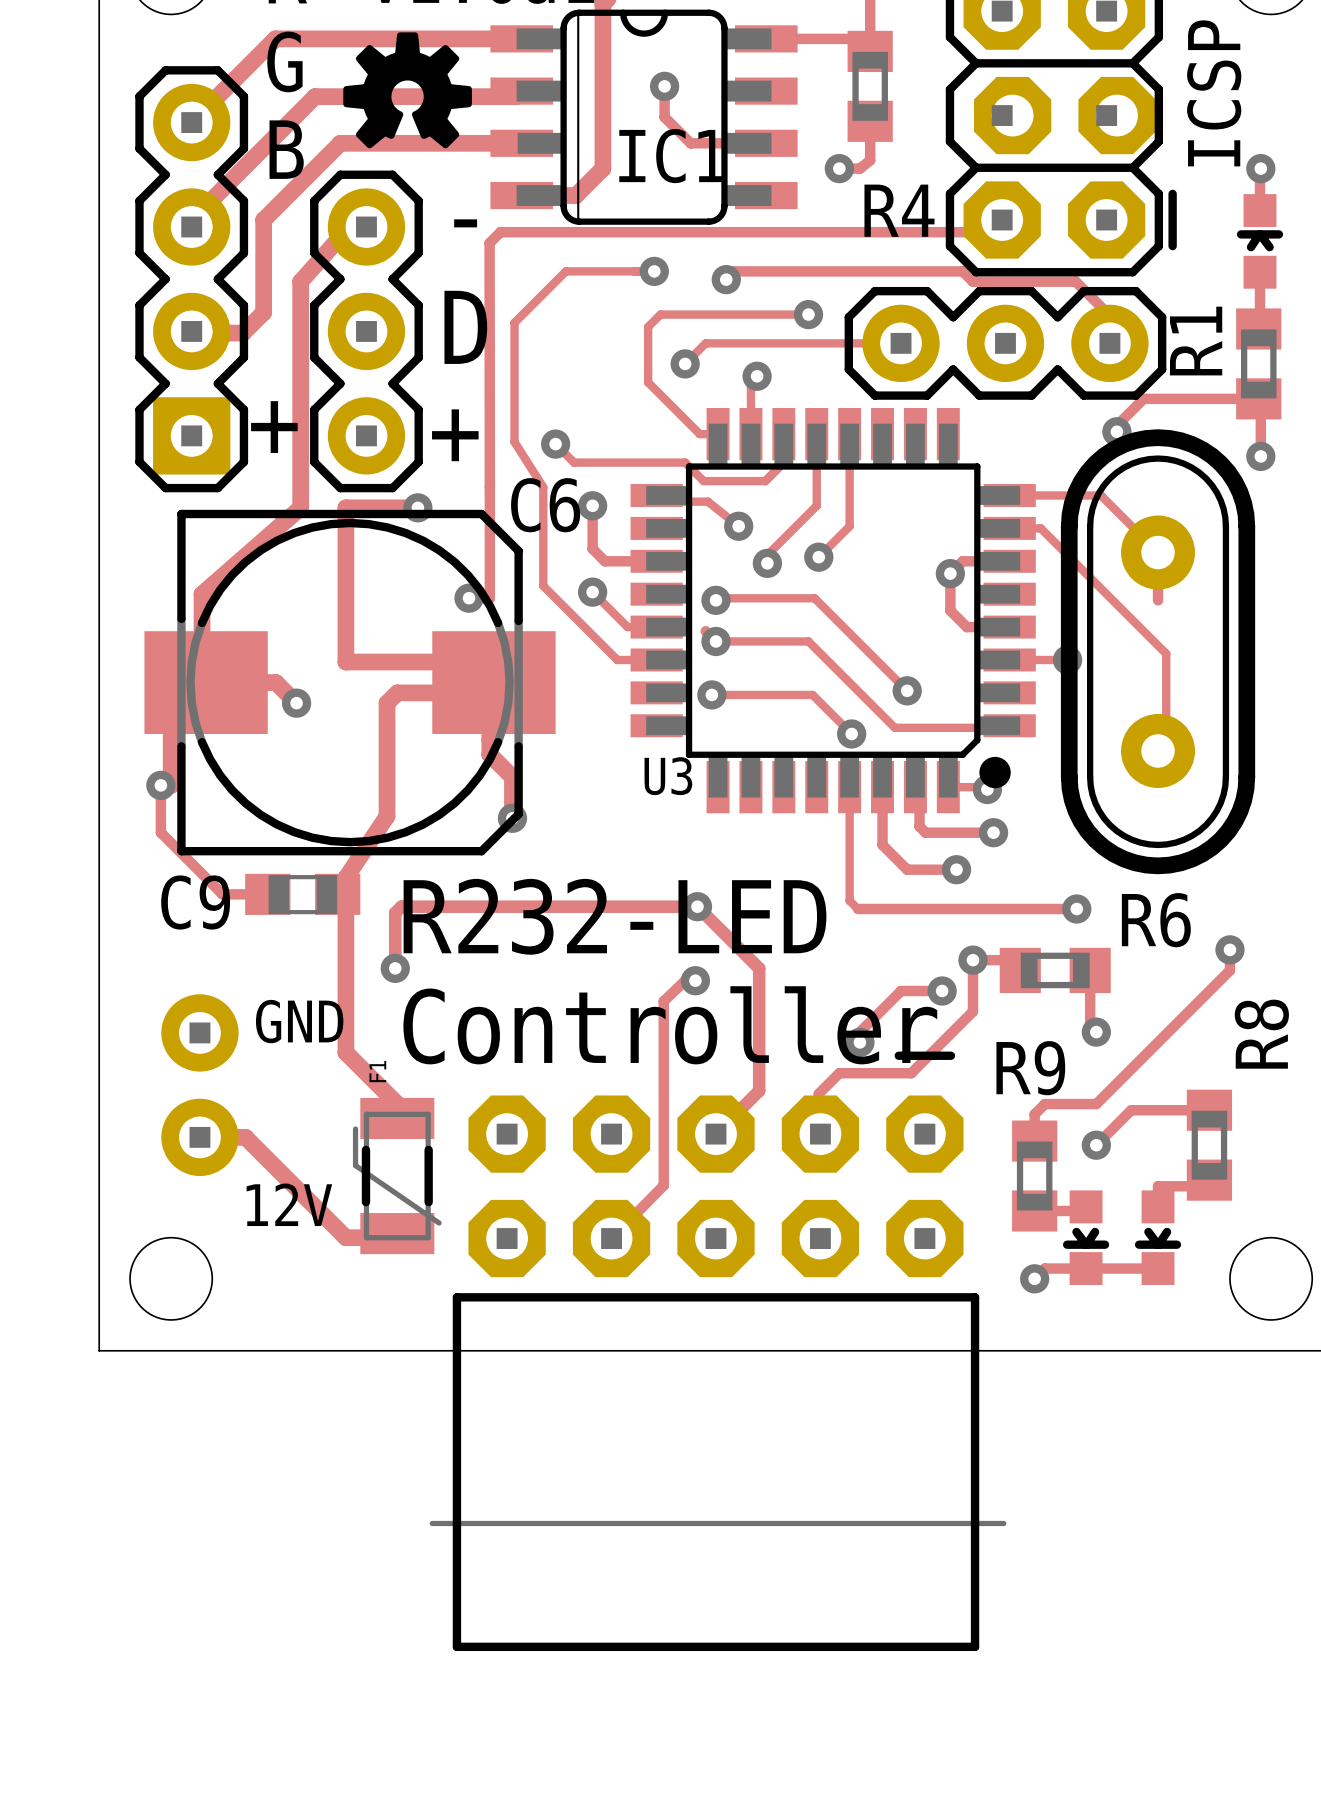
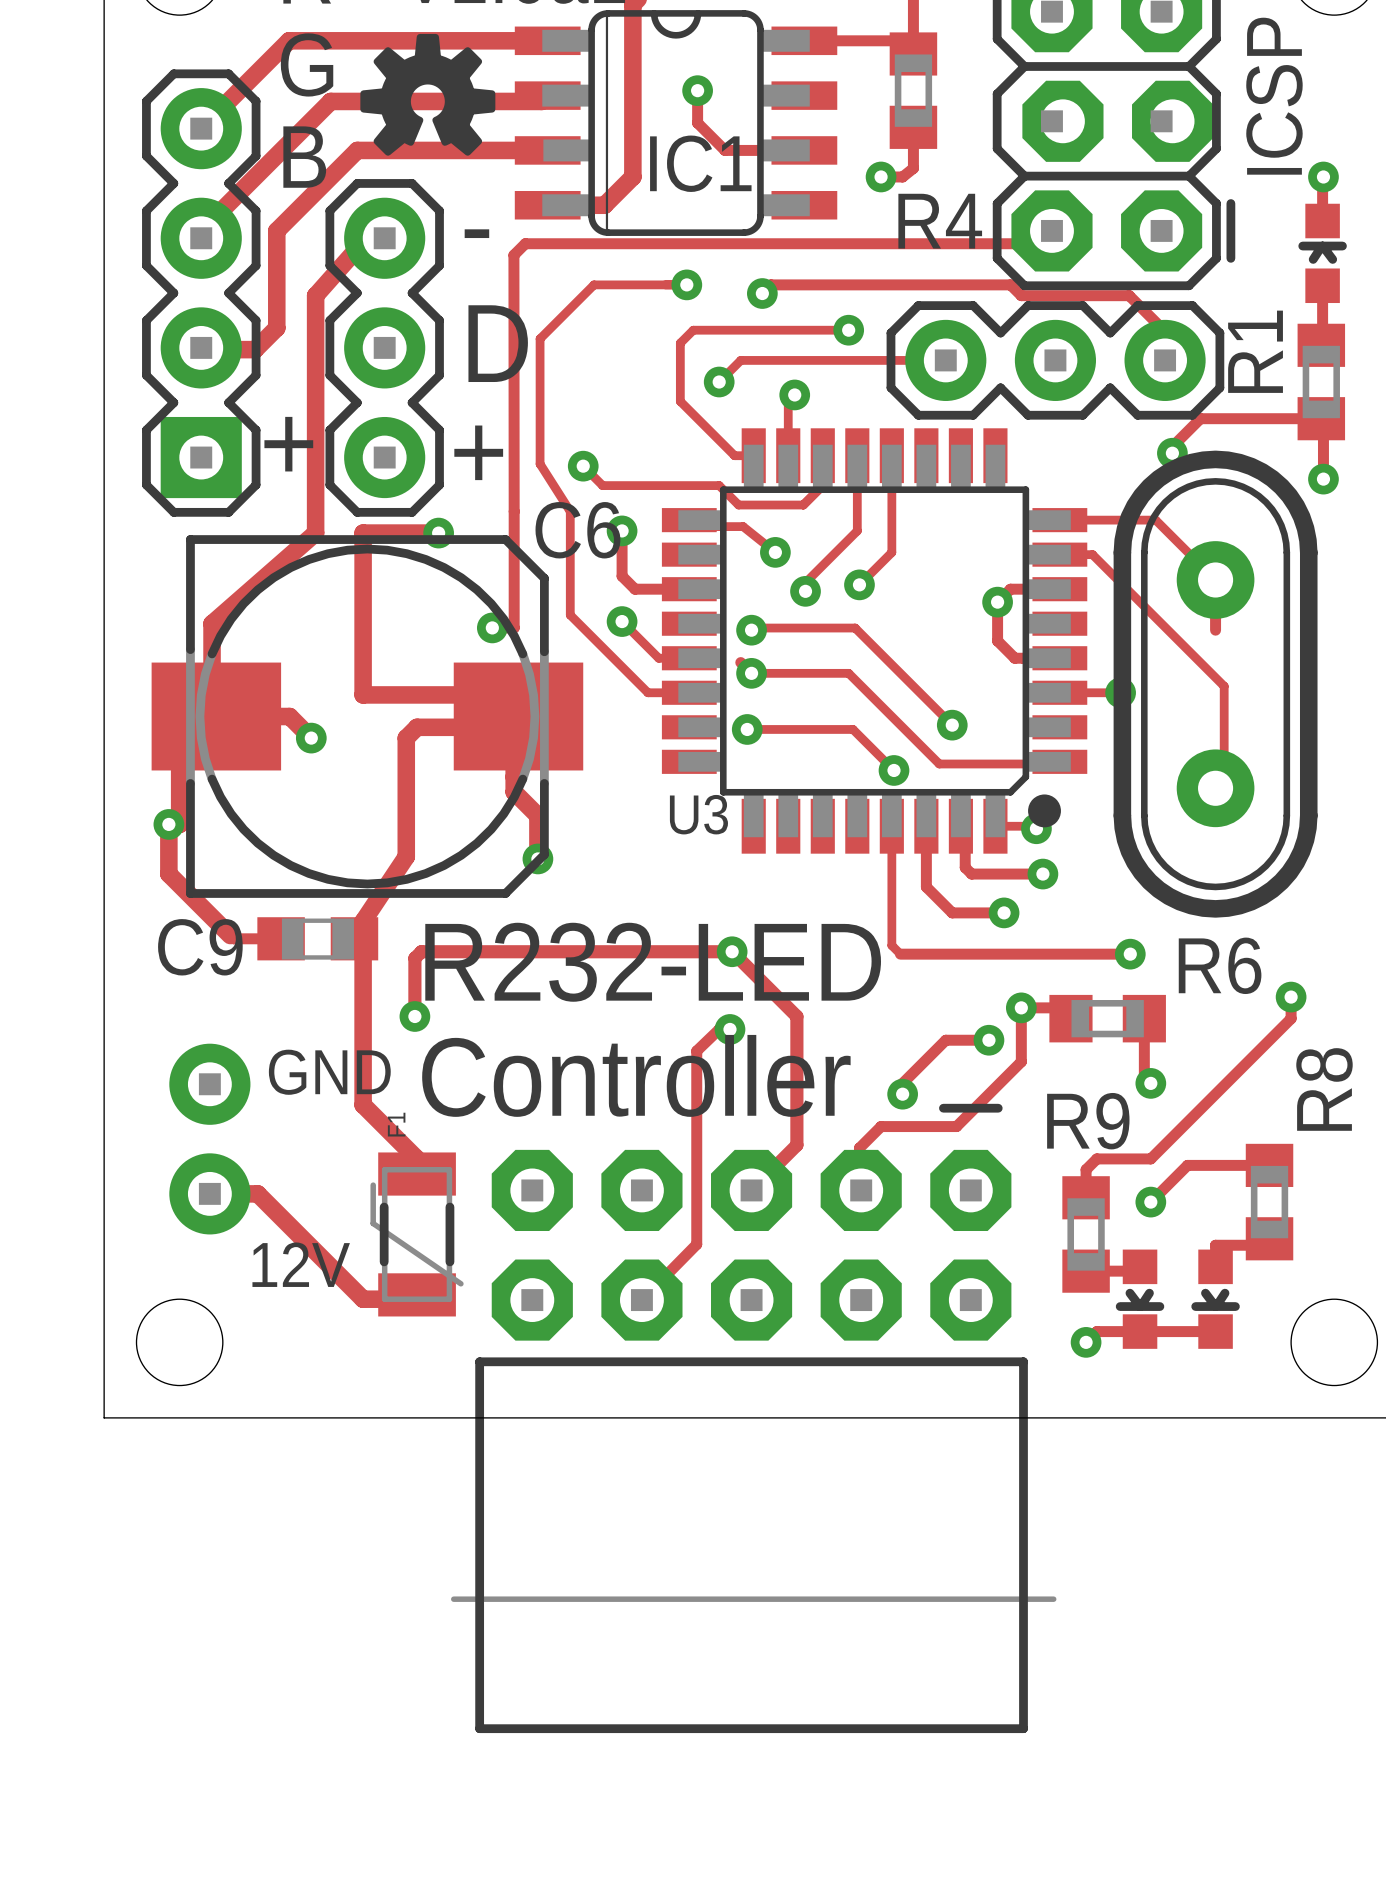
track width: thin (160, 785) (160, 832) (219, 891) -> thick (168, 824) (168, 874) (230, 935)

